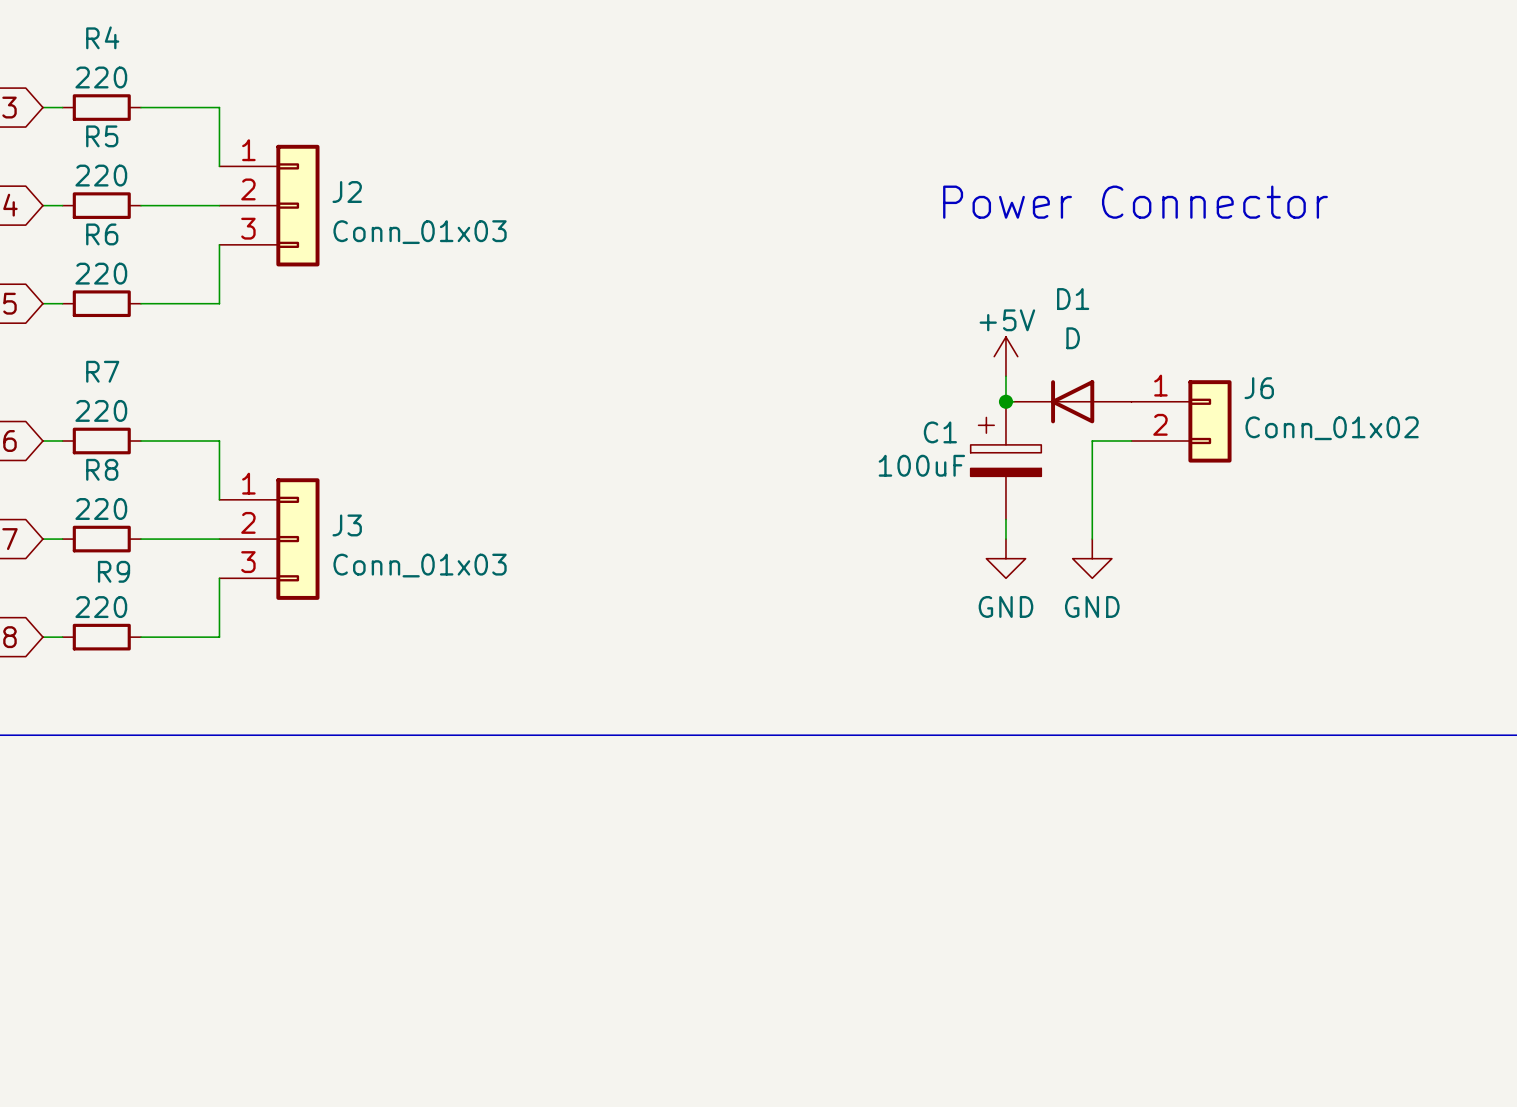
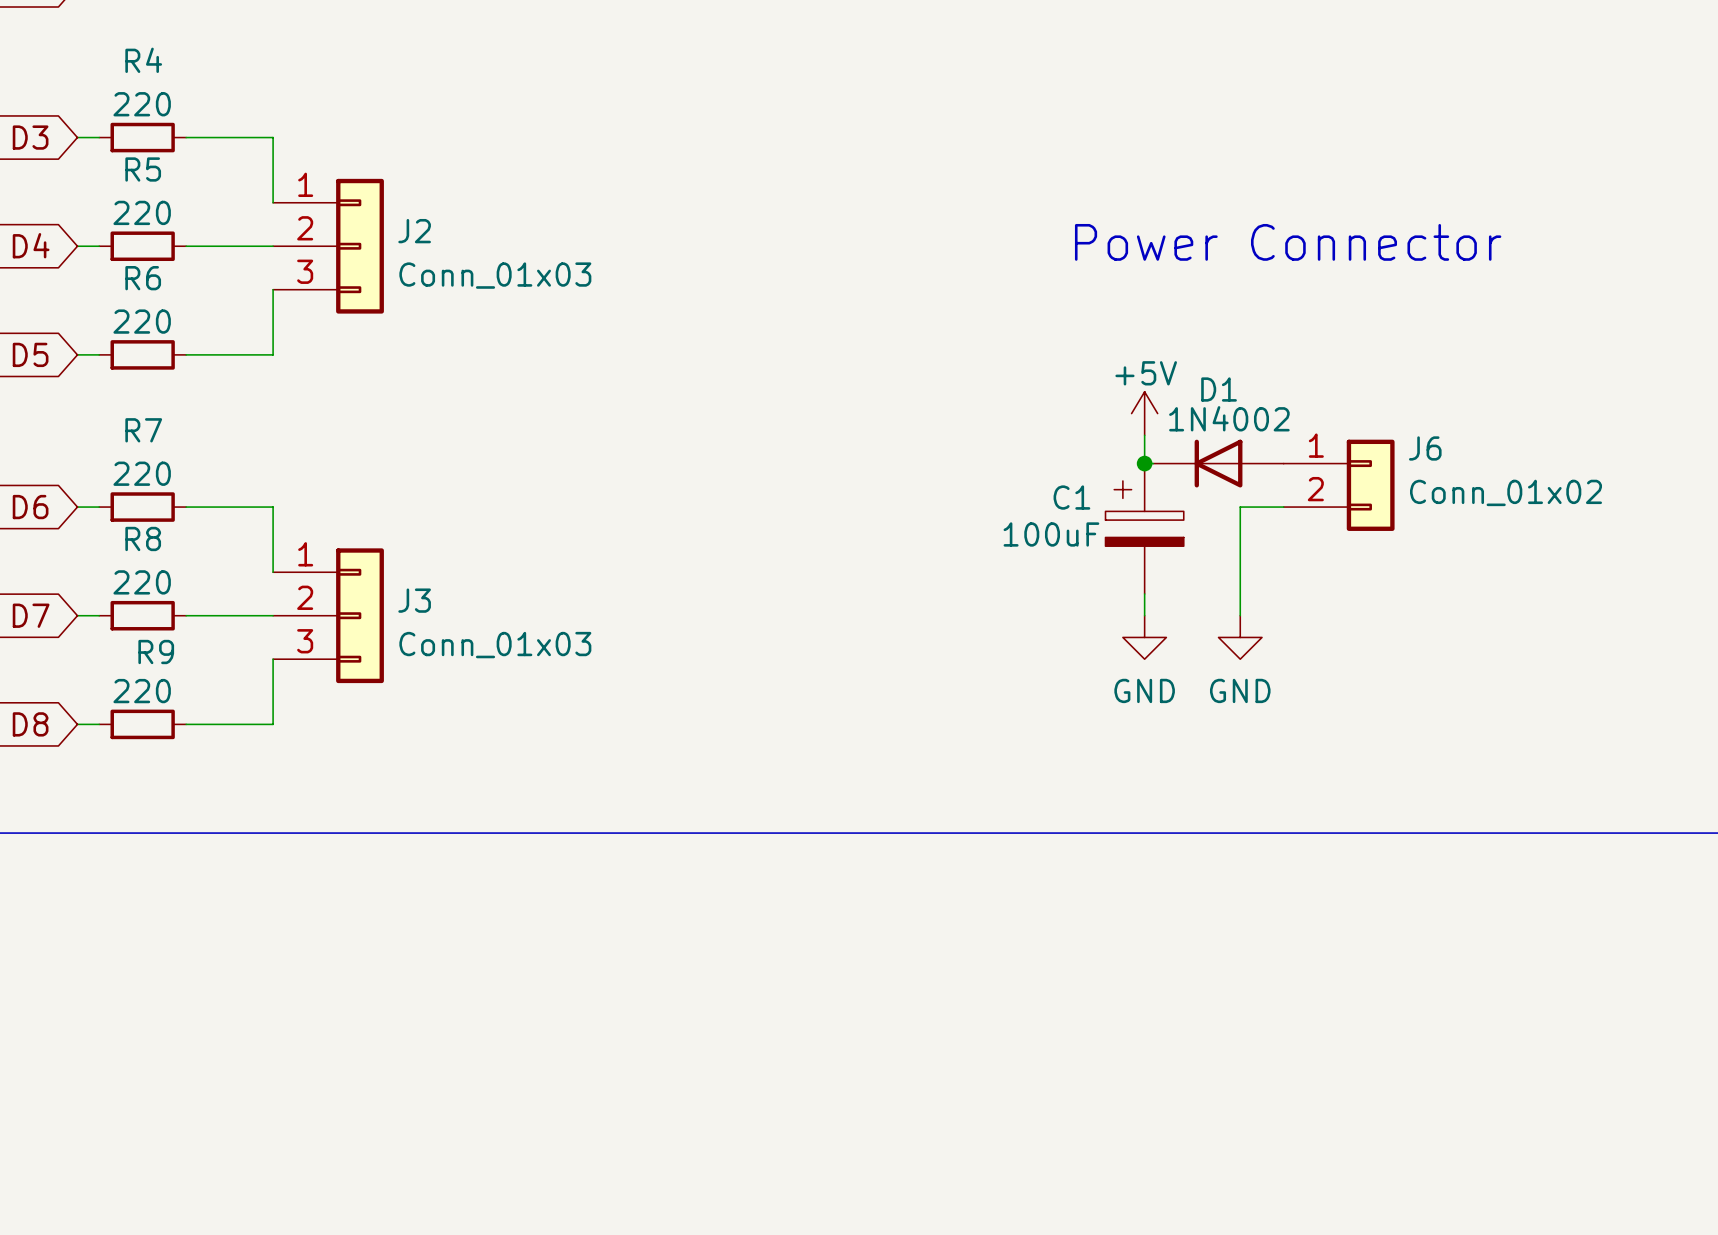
D1 name position: D1 (1073, 299) -> D1 (1219, 389)
D1 value: D (1073, 338) -> 1N4002 (1229, 418)

